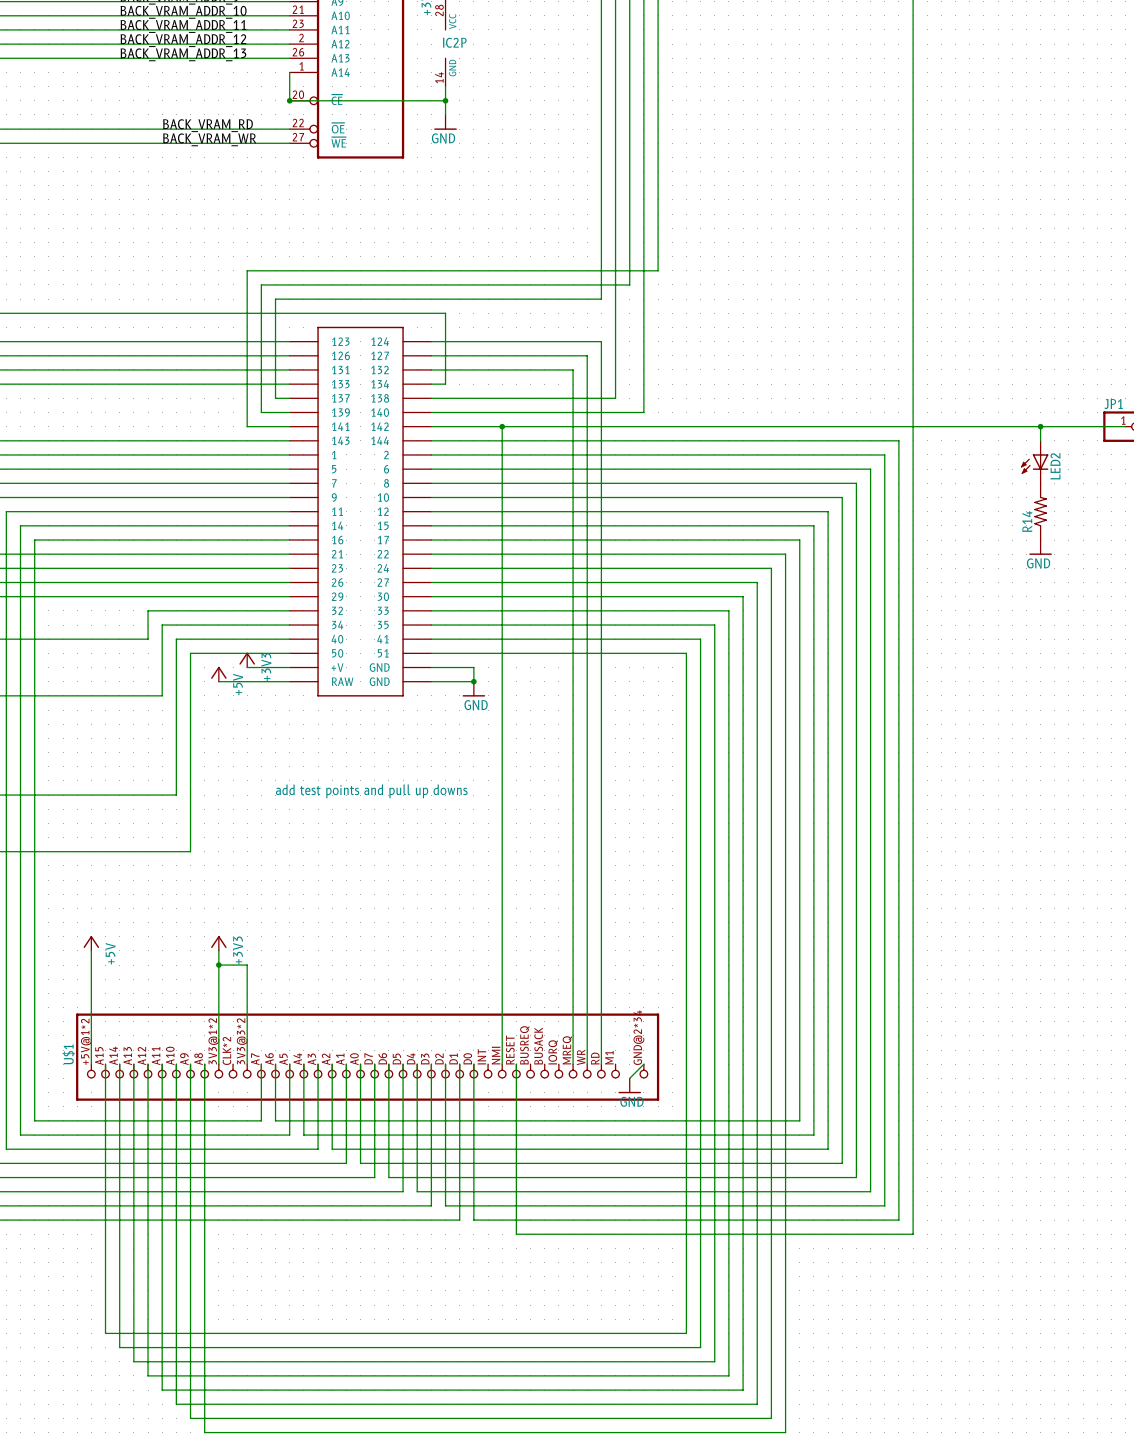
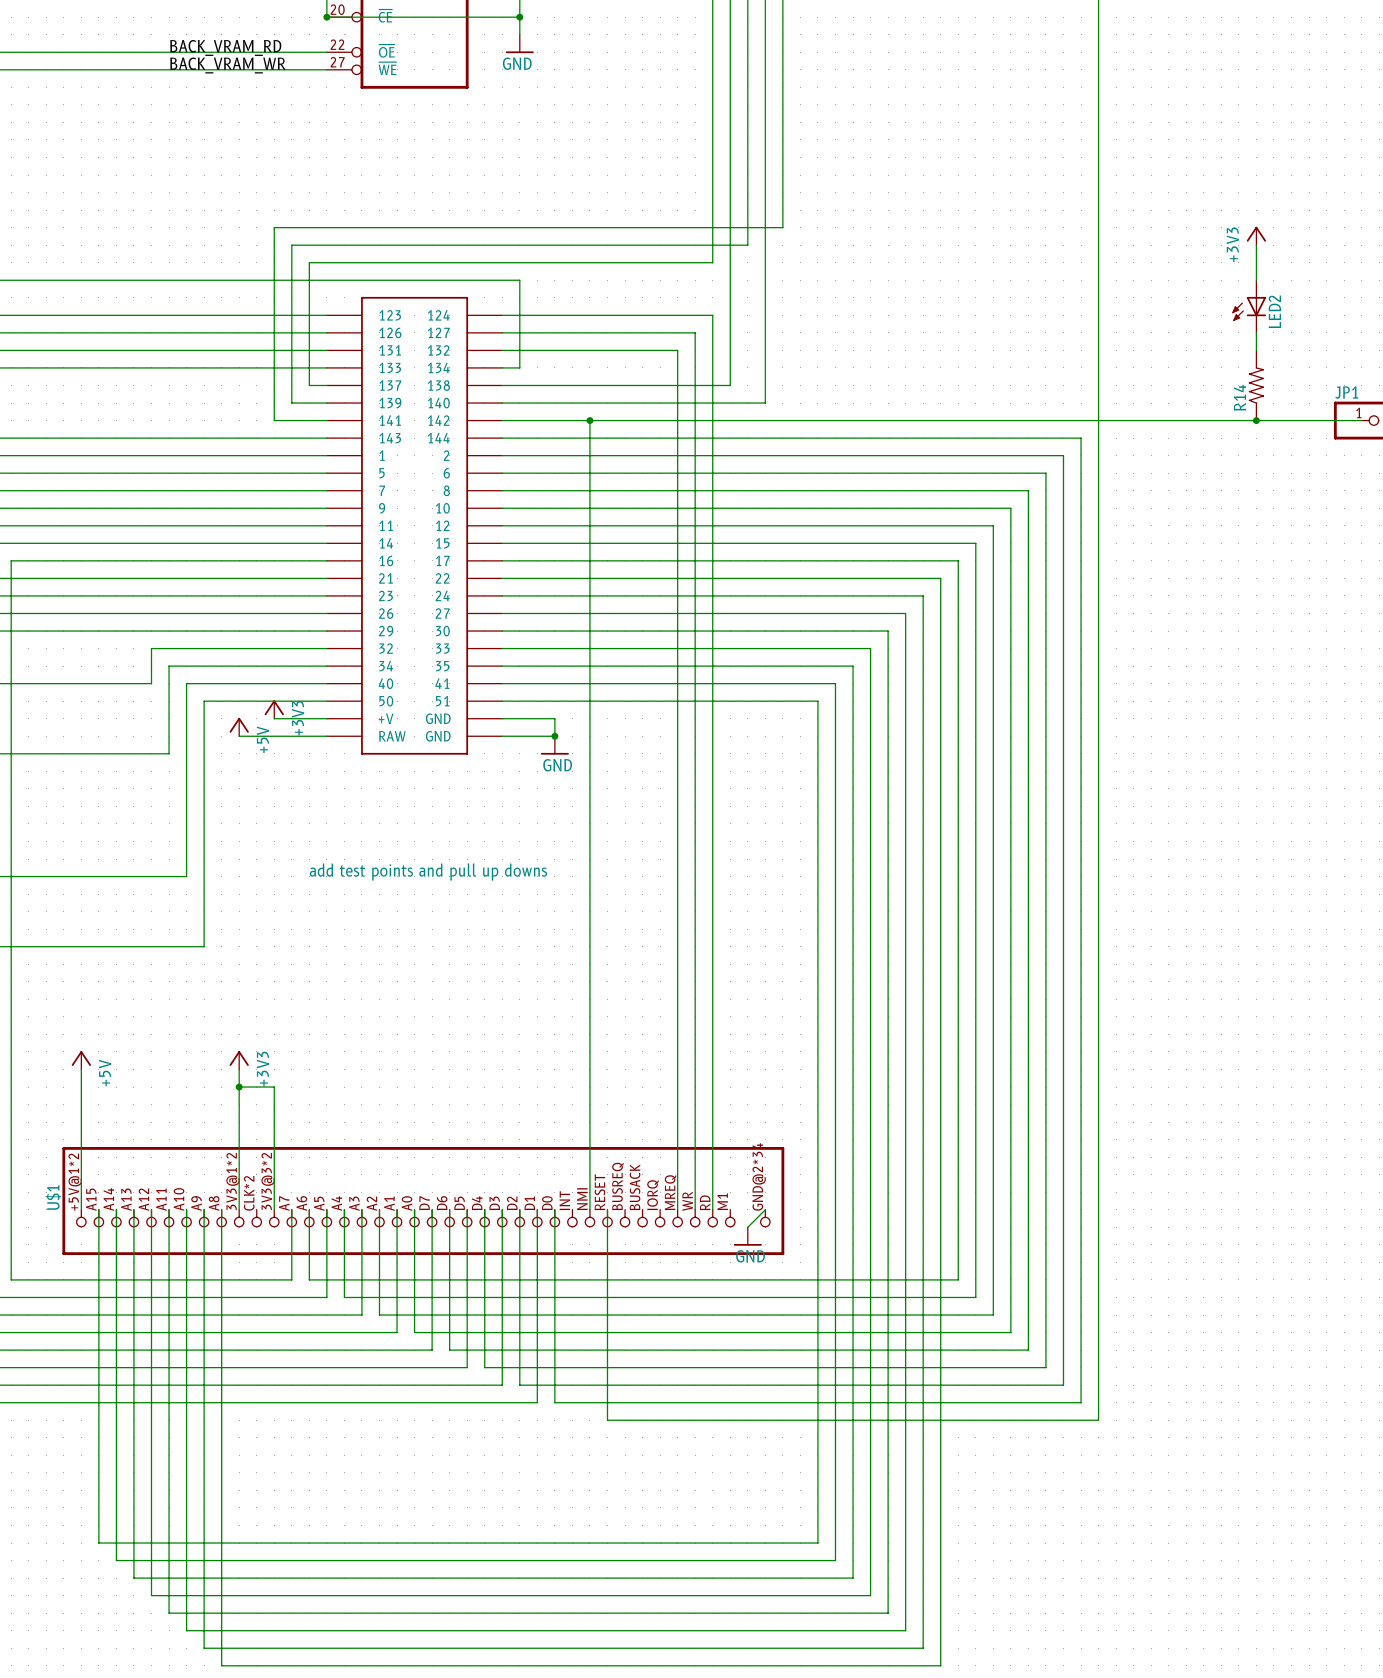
power symbol: none -> +3V3 (1256, 235)
wire: none -> (1256, 245) (1256, 280)
wire: (1040, 426) (1040, 440) -> (1256, 332) (1256, 350)
LED2 position: (1034, 462) -> (1249, 306)
R14 position: (1040, 511) -> (1256, 385)
power symbol: GND (1040, 547) -> none

